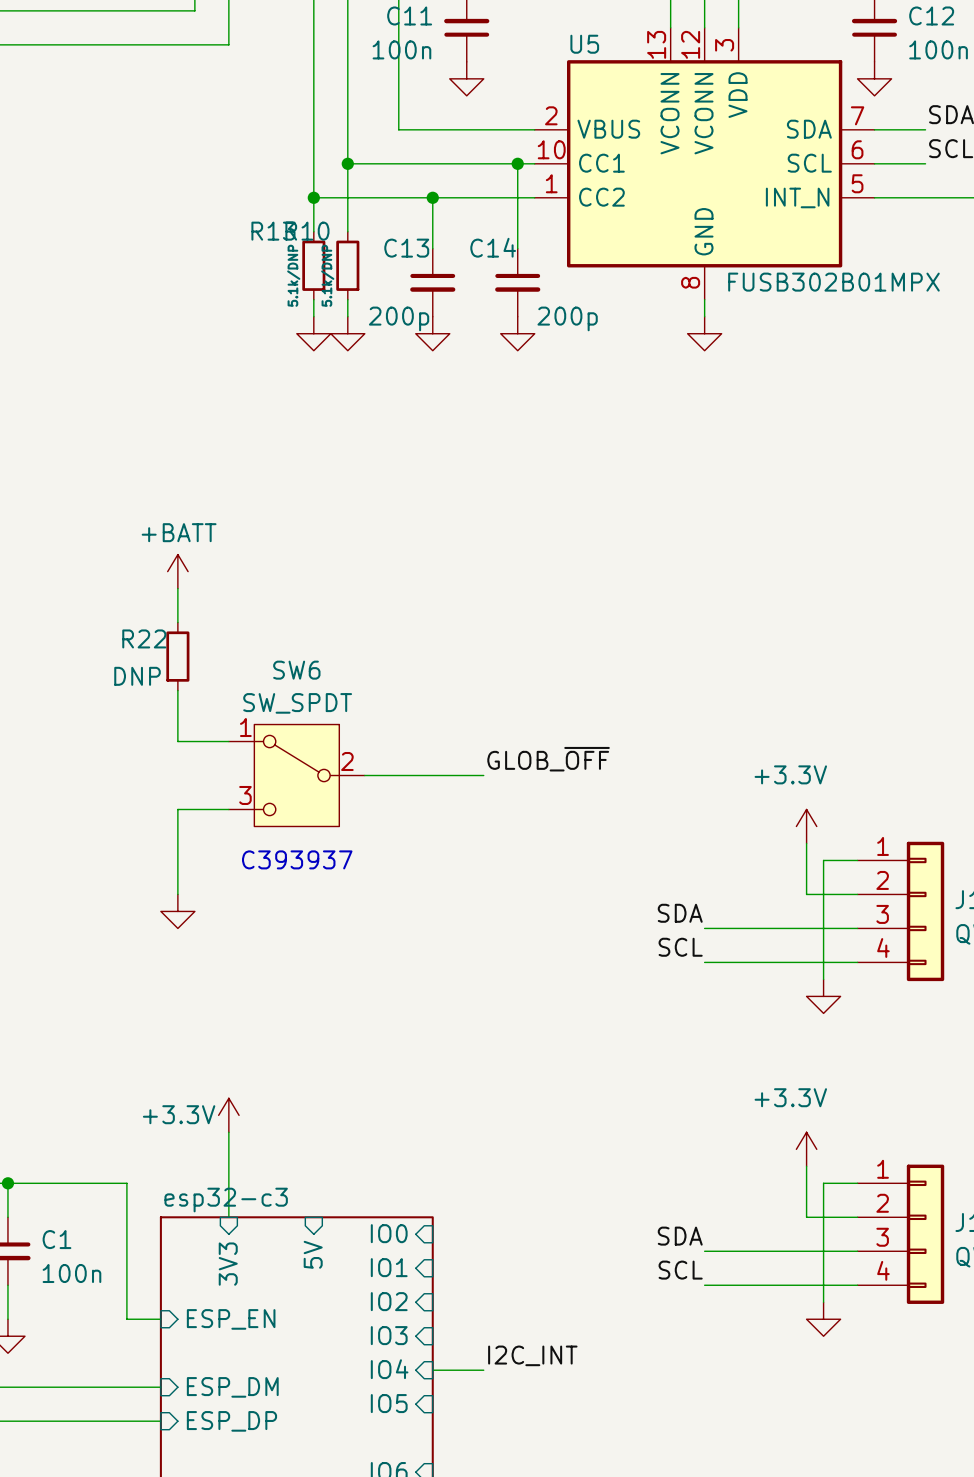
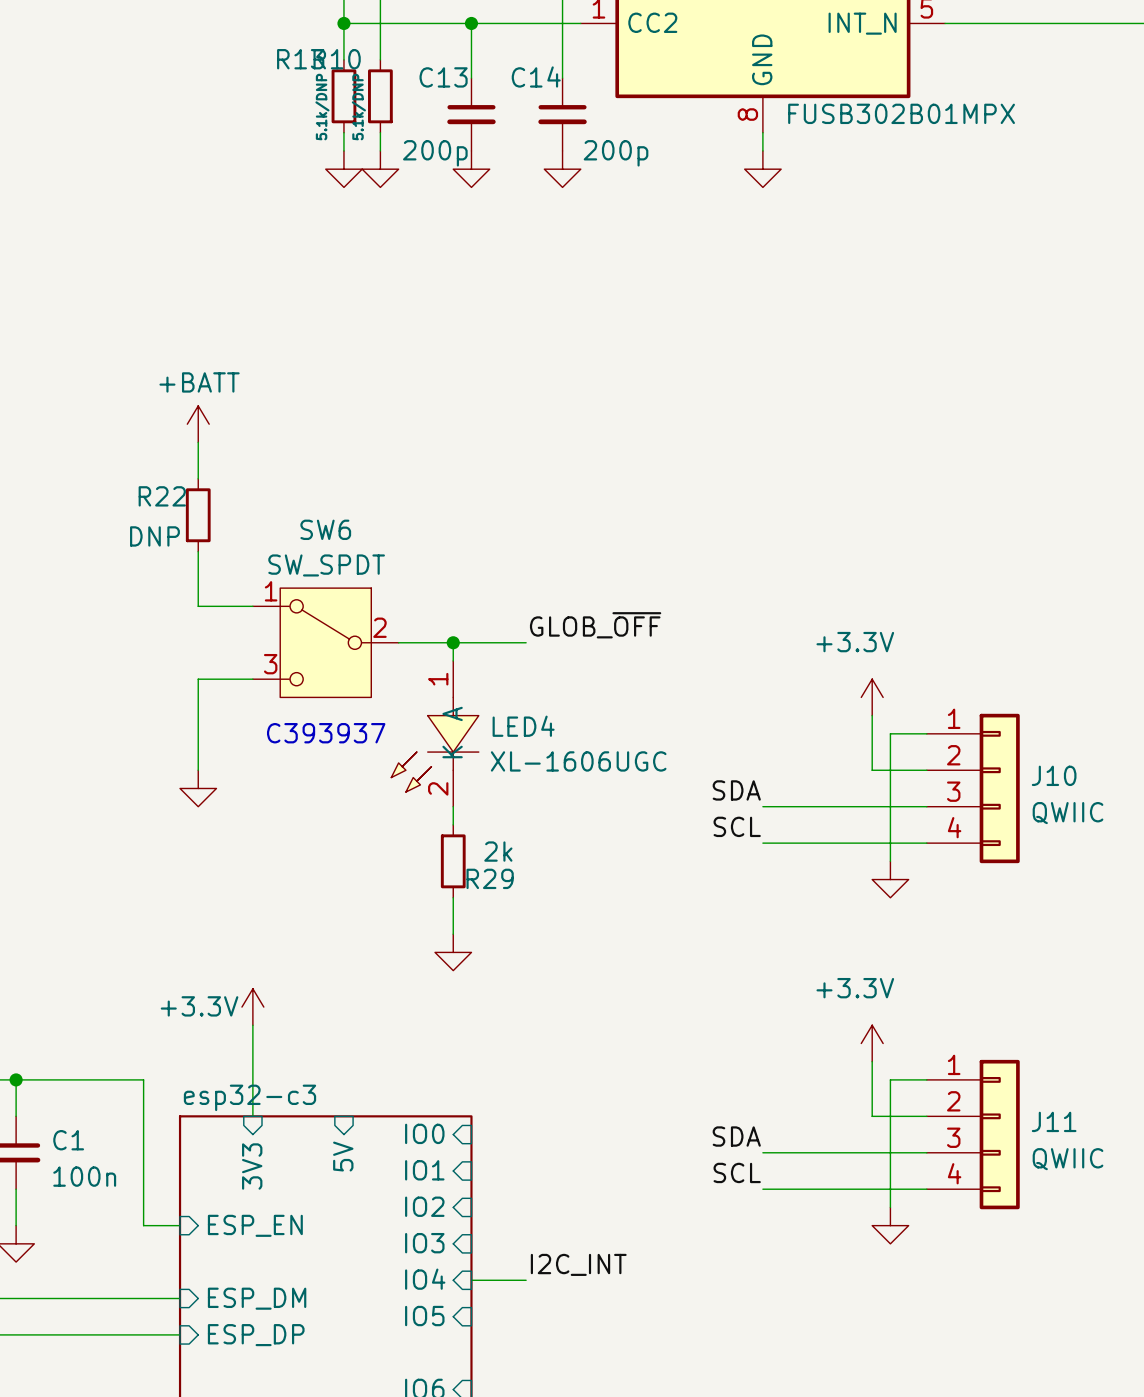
wire: none -> (453, 642) (453, 660)
junction: none -> (453, 642)
LED4: none -> XL-1606UGC (435, 733)
wire: none -> (453, 806) (453, 824)
R29: none -> 2k (453, 861)
wire: none -> (453, 897) (453, 934)
power symbol: none -> (453, 952)

